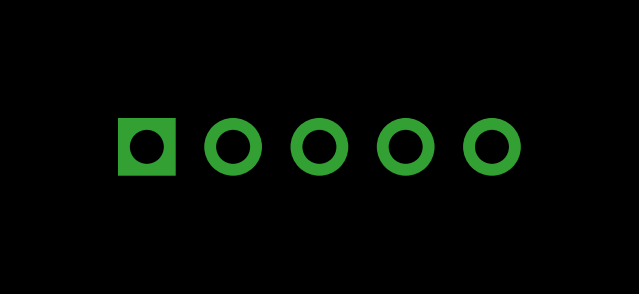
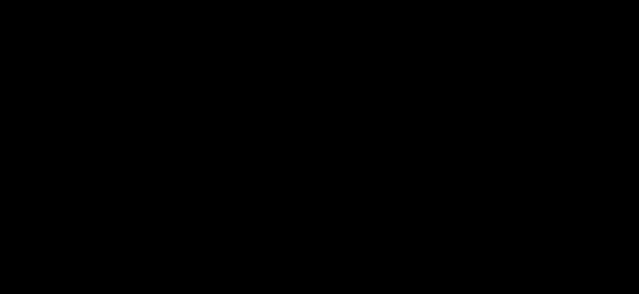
part: (319, 146) -> none

